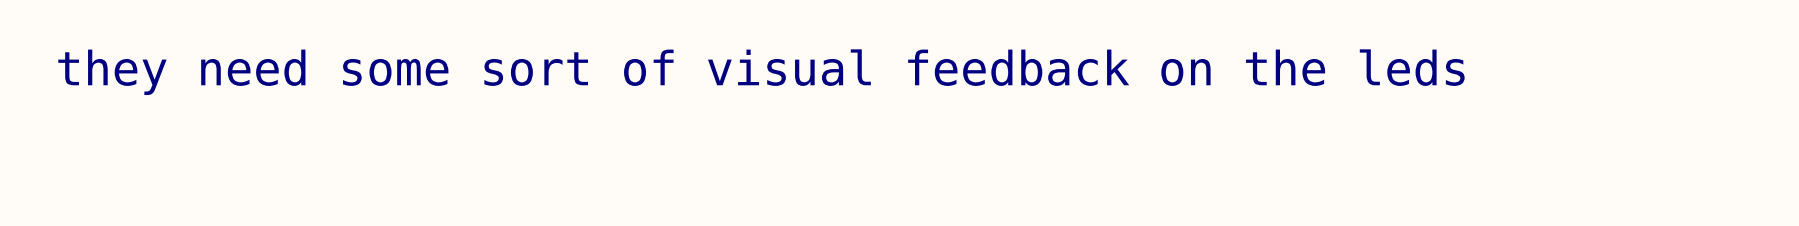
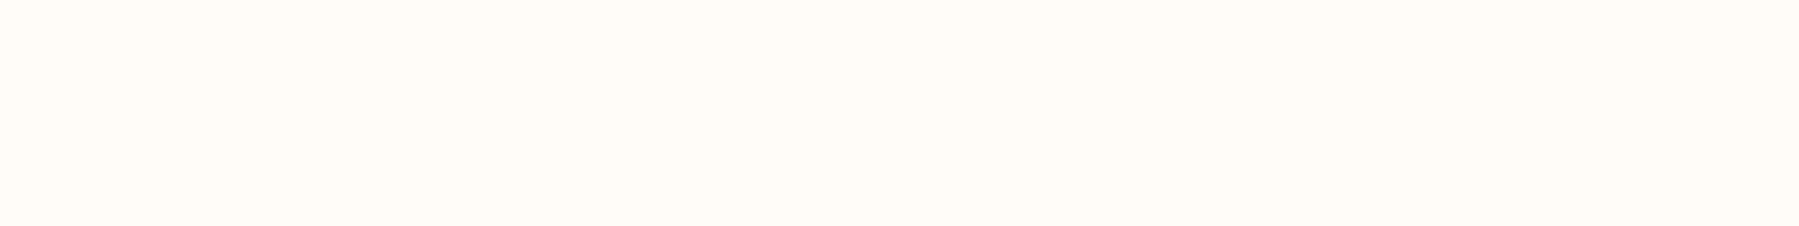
text: they need some sort of visual feedback on the leds (761, 72) -> none

